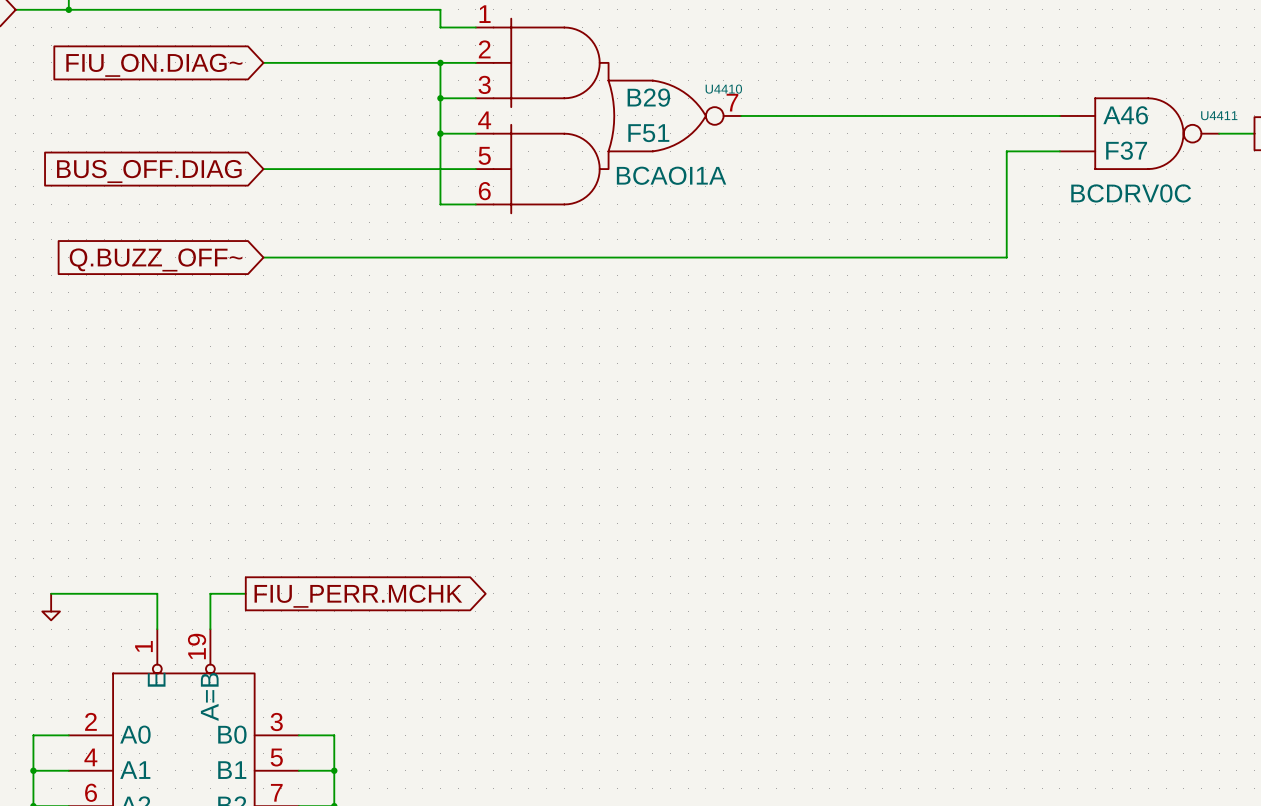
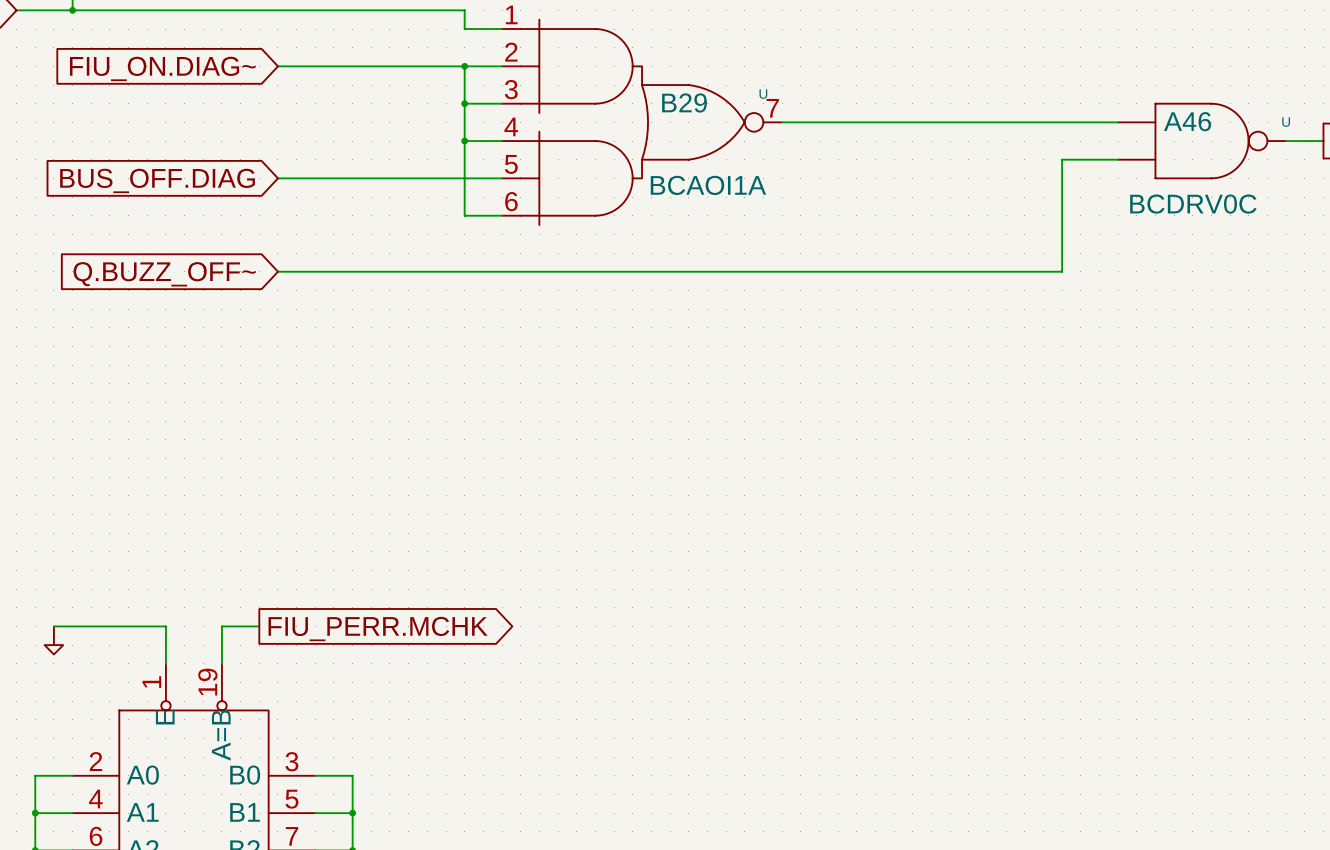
U4410 name: U4410 (723, 89) -> U (763, 94)
U4411 name: U4411 (1219, 115) -> U (1286, 122)
U4410 value: F51 (648, 133) -> none
U4411 value: F37 (1126, 150) -> none

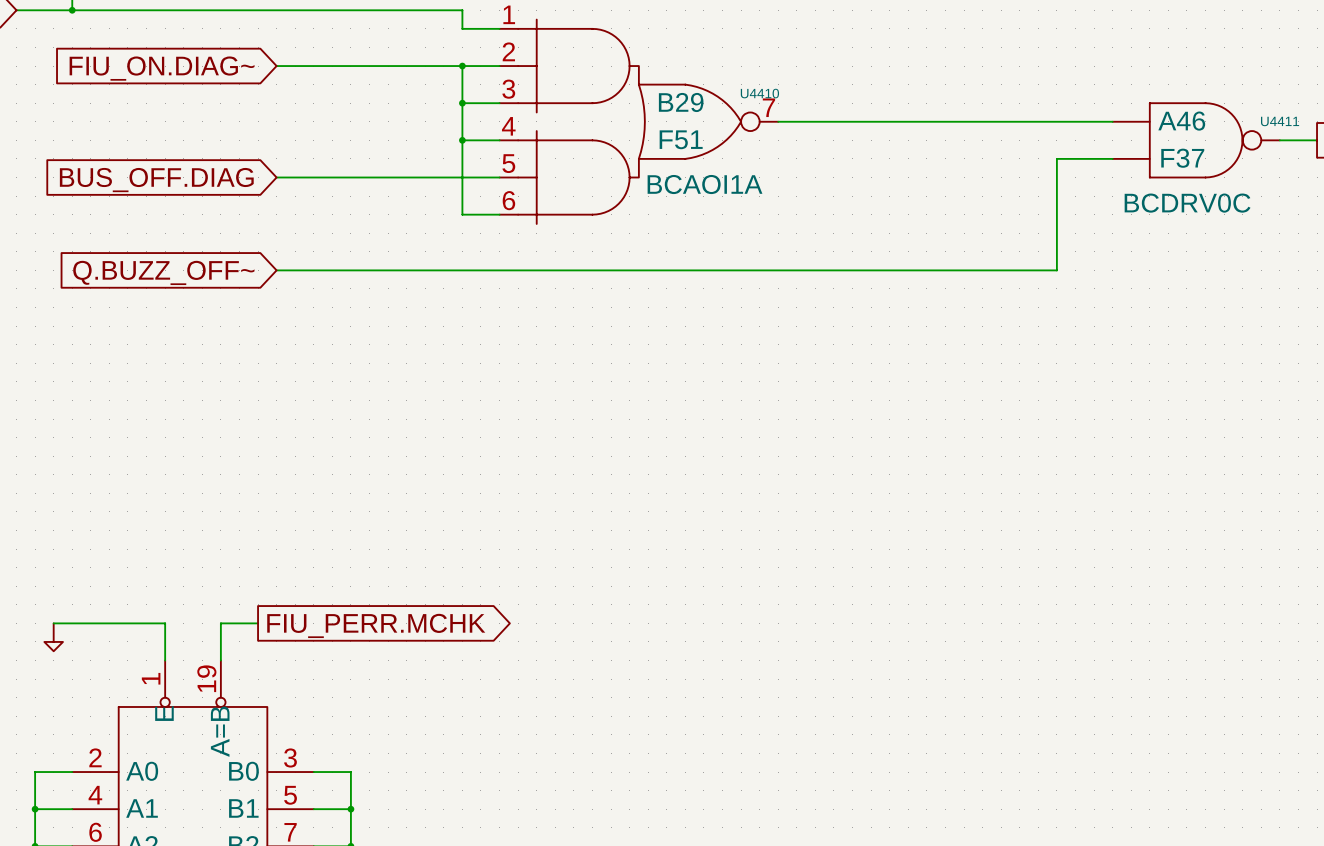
U name: U (763, 94) -> U4410 (759, 93)
U name: U (1286, 122) -> U4411 (1280, 121)
U value: none -> F51 (681, 139)
U value: none -> F37 (1182, 158)

